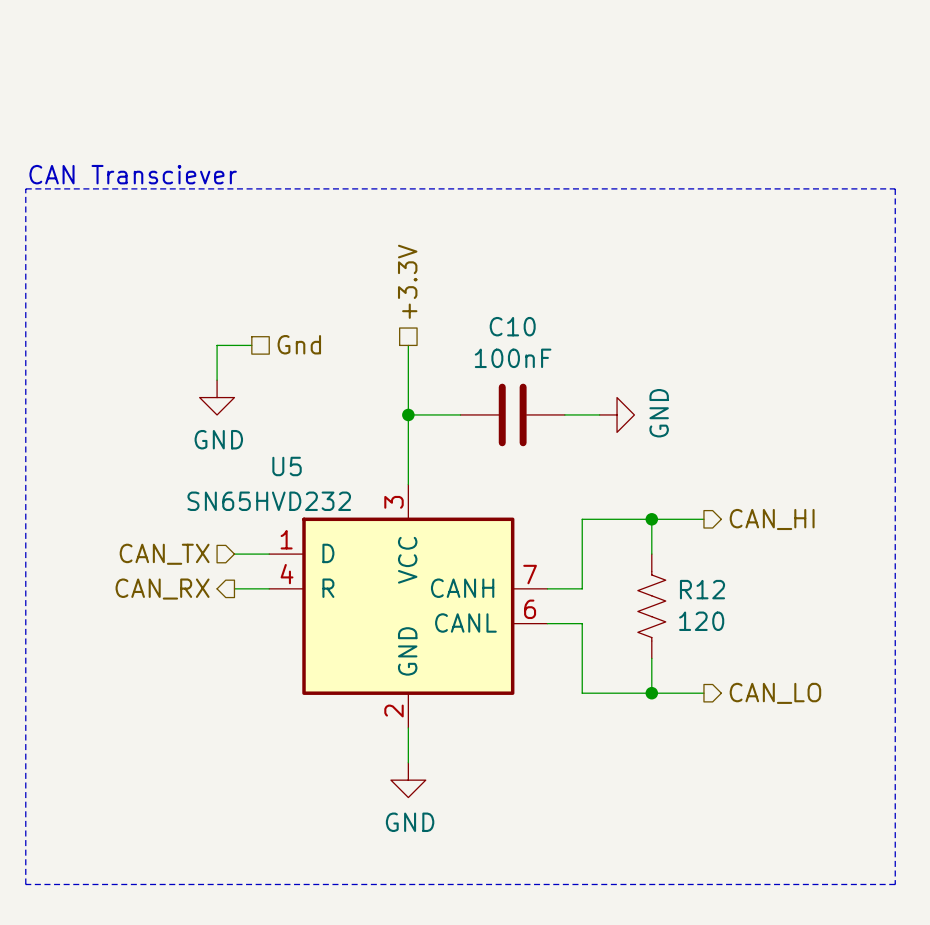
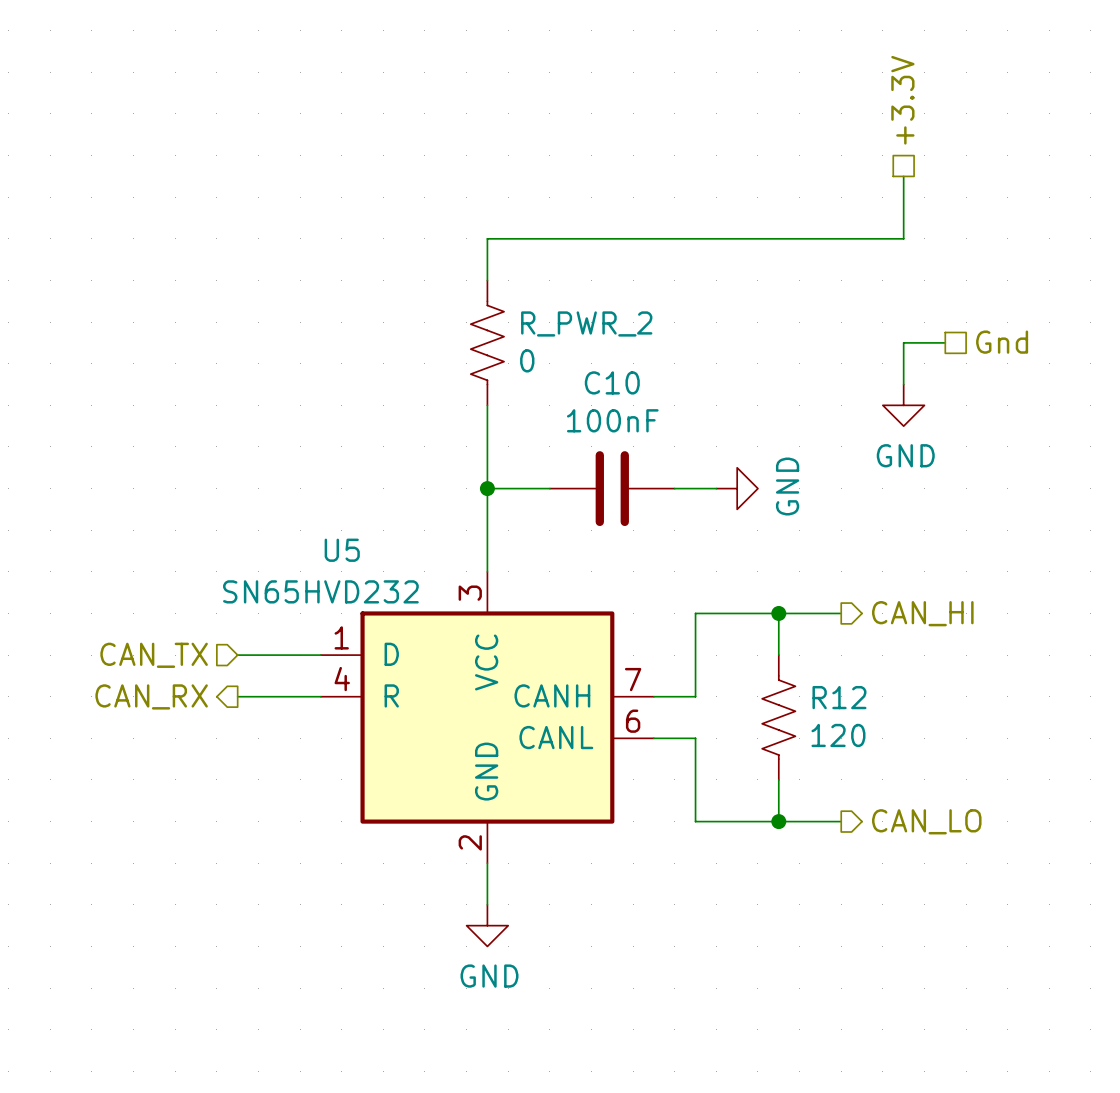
hierarchical label: none -> +3.3V (902, 100)
wire: none -> (903, 176) (903, 238) (487, 238) (487, 280)
text: CAN Transciever (133, 174) -> none
line: (25, 188) (895, 188) (895, 884) (25, 884) (25, 188) -> none
hierarchical label: +3.3V (407, 281) -> none
hierarchical label: none -> Gnd (1002, 342)
R_PWR_2: none -> 0 (487, 342)
wire: none -> (945, 342) (903, 342) (903, 384)
hierarchical label: Gnd (299, 344) -> none
wire: (251, 345) (217, 345) (217, 380) -> none
power symbol: none -> GND (903, 405)
power symbol: GND (217, 397) -> none
hierarchical label position: CAN_TX (164, 554) -> CAN_TX (154, 655)
wire: none -> (237, 655) (279, 655)
wire: none -> (237, 696) (279, 696)
hierarchical label position: CAN_RX (162, 589) -> CAN_RX (151, 696)

